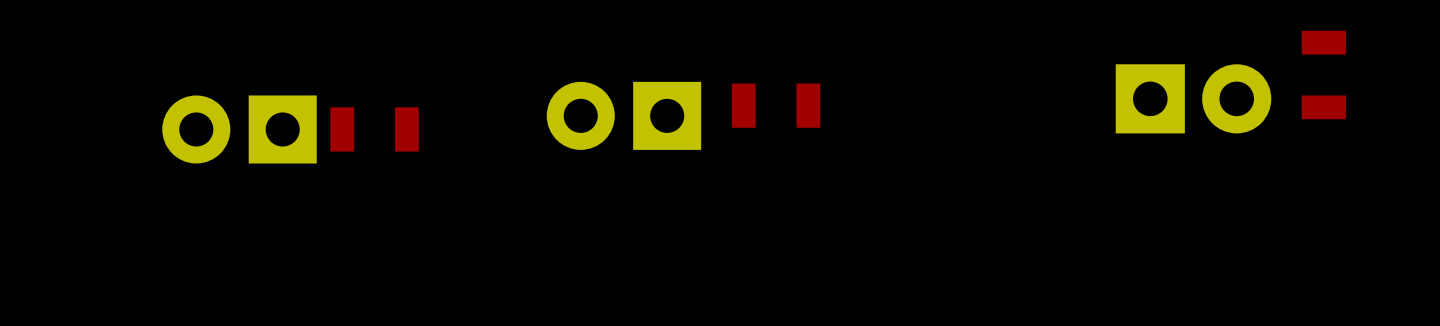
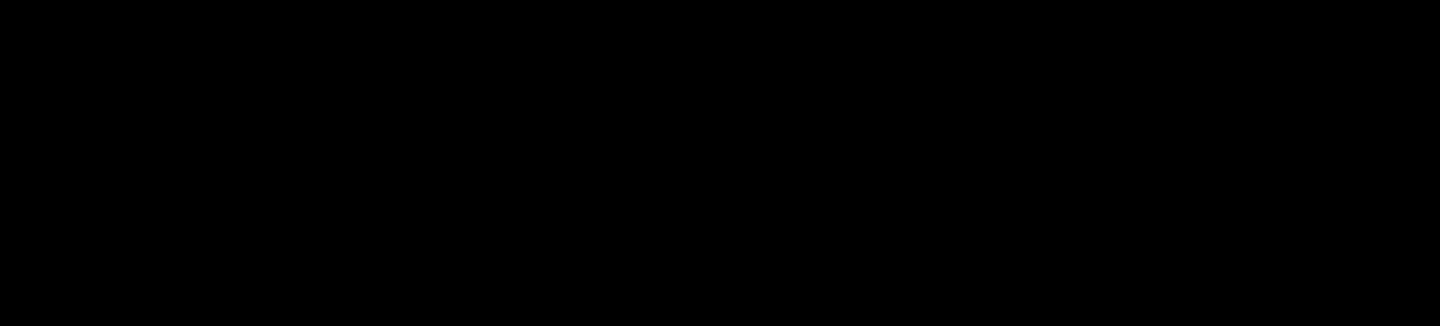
part: (1323, 75) -> none
part: (1193, 98) -> none
part: (776, 105) -> none
part: (623, 115) -> none
part: (239, 129) -> none
part: (374, 129) -> none

